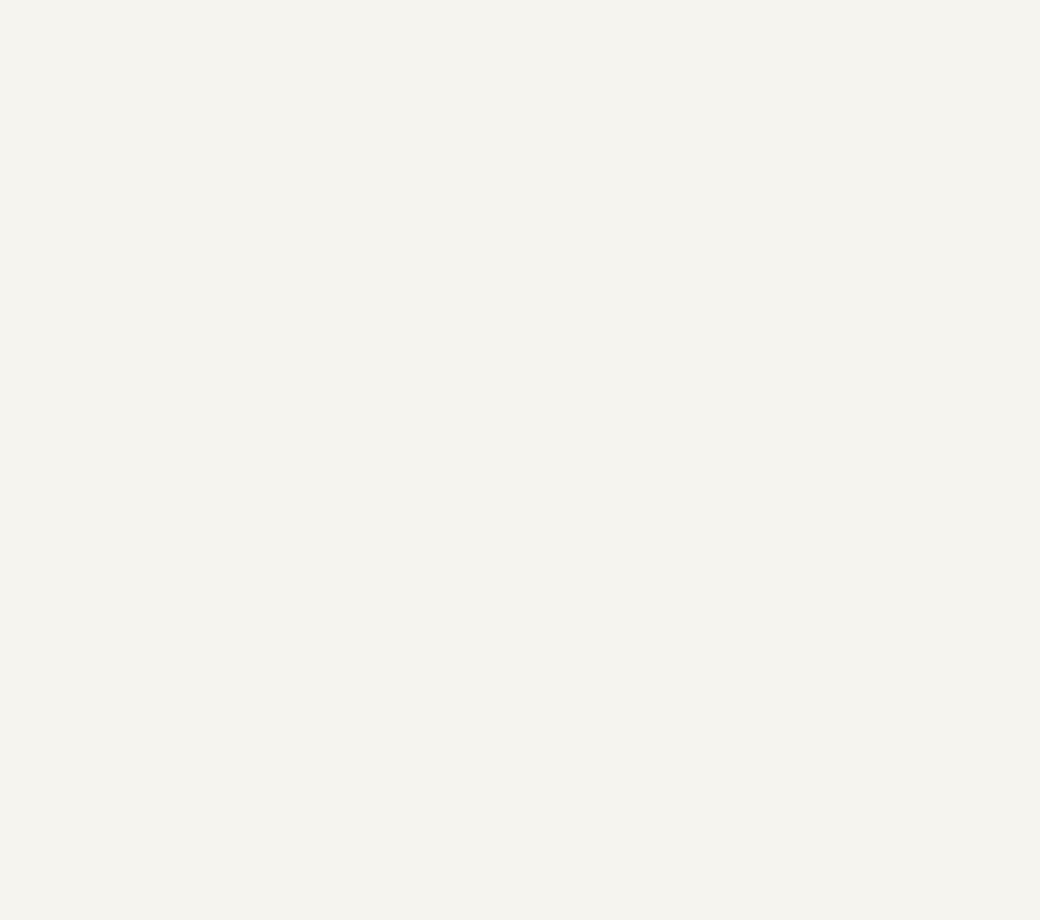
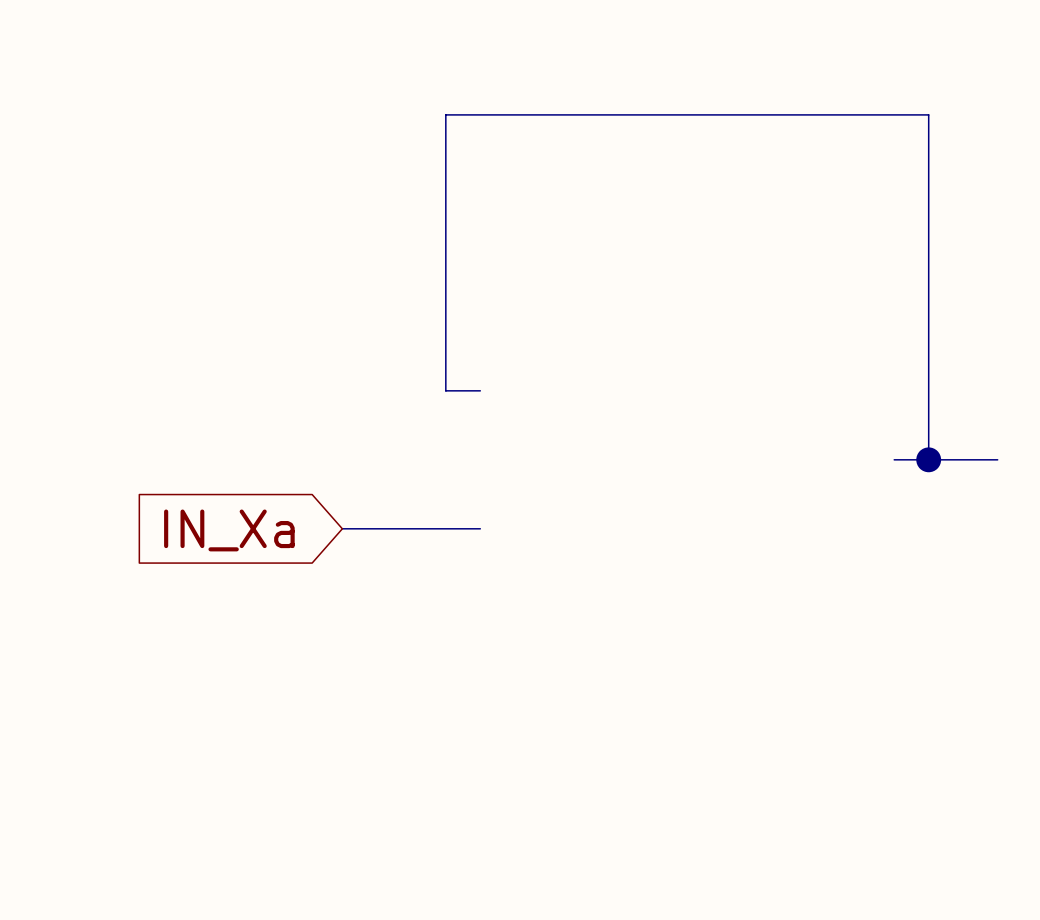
wire: none -> (480, 390) (445, 390) (445, 114) (928, 114) (928, 459)
wire: none -> (894, 459) (997, 459)
junction: none -> (928, 459)
wire: none -> (342, 528) (480, 528)
global label: none -> IN_Xa (229, 530)

